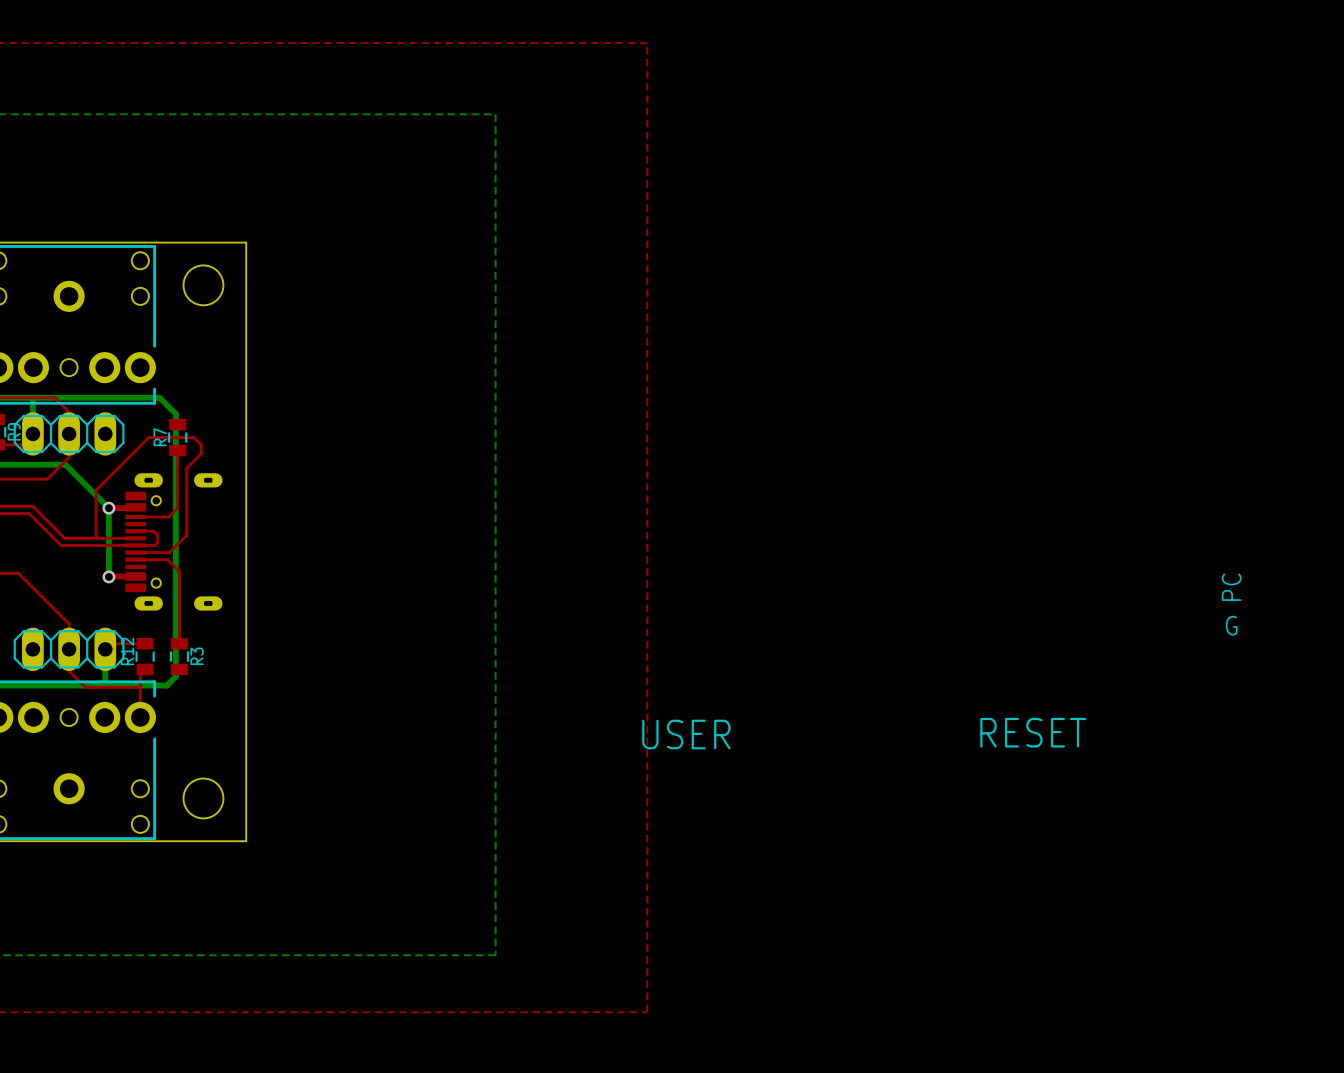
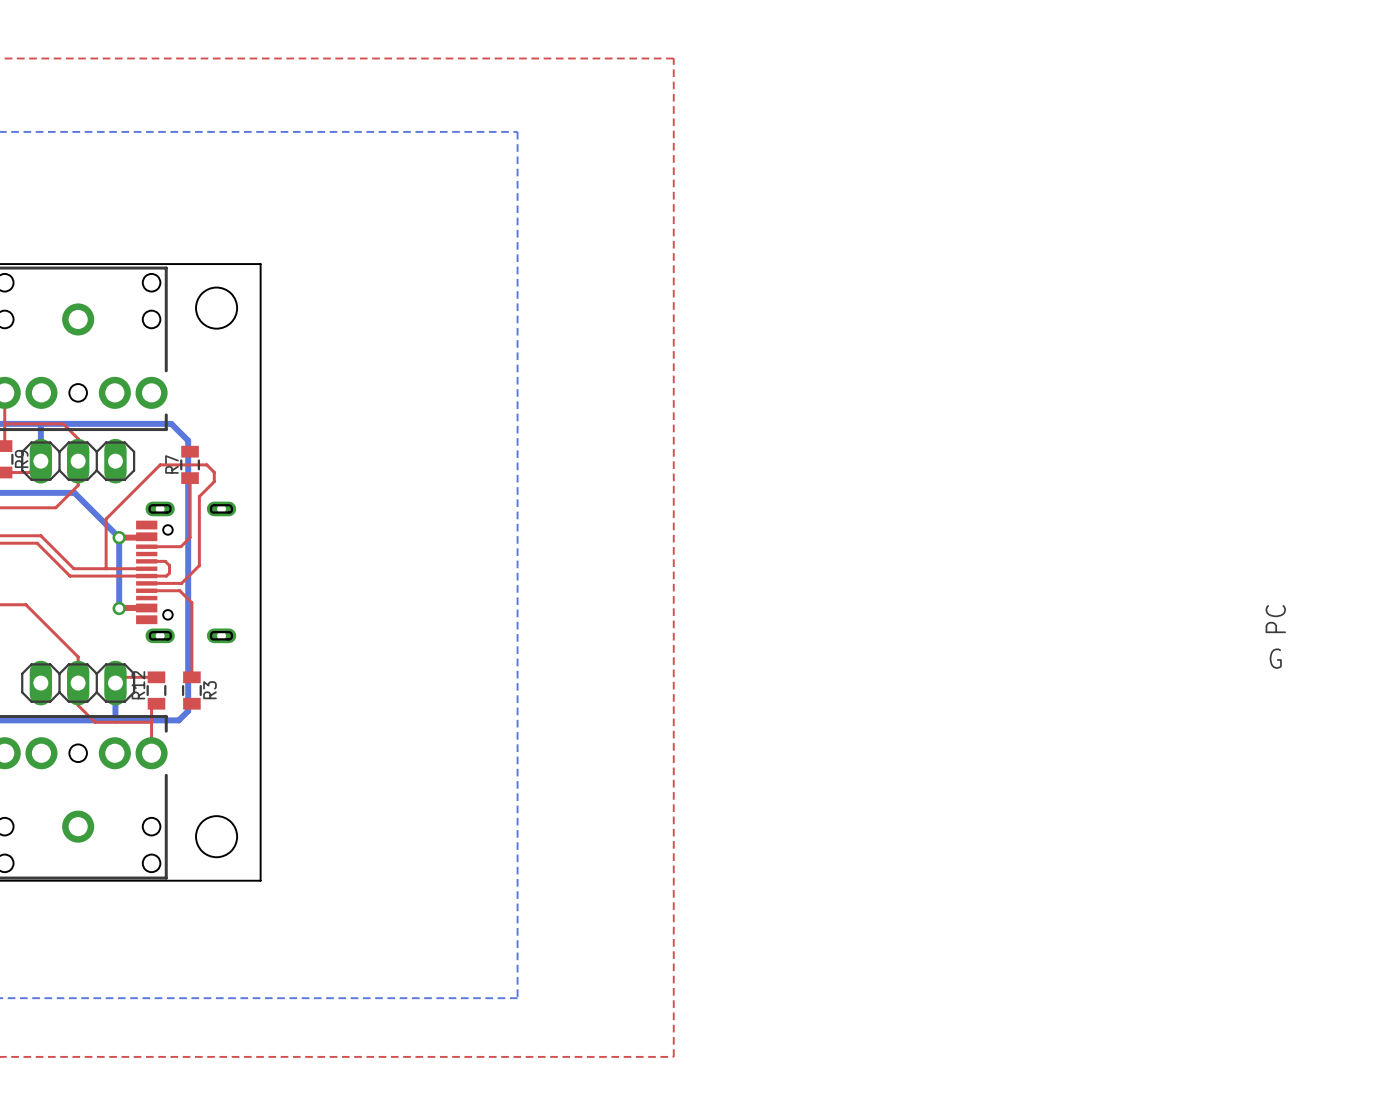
text: RESET (1033, 732) -> none
text: USER (686, 734) -> none

